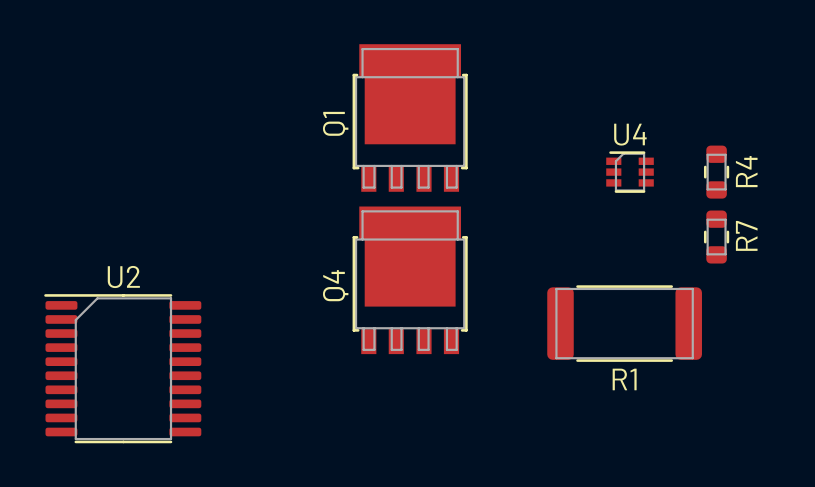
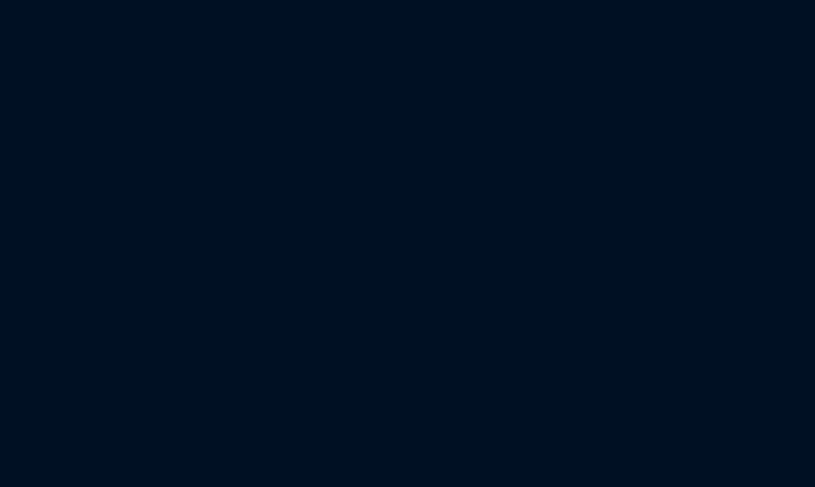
Q1: (410, 117) -> none
U4: (630, 172) -> none
R4: (716, 172) -> none
R7: (716, 237) -> none
Q4: (410, 280) -> none
R1: (624, 323) -> none
U2: (122, 368) -> none

